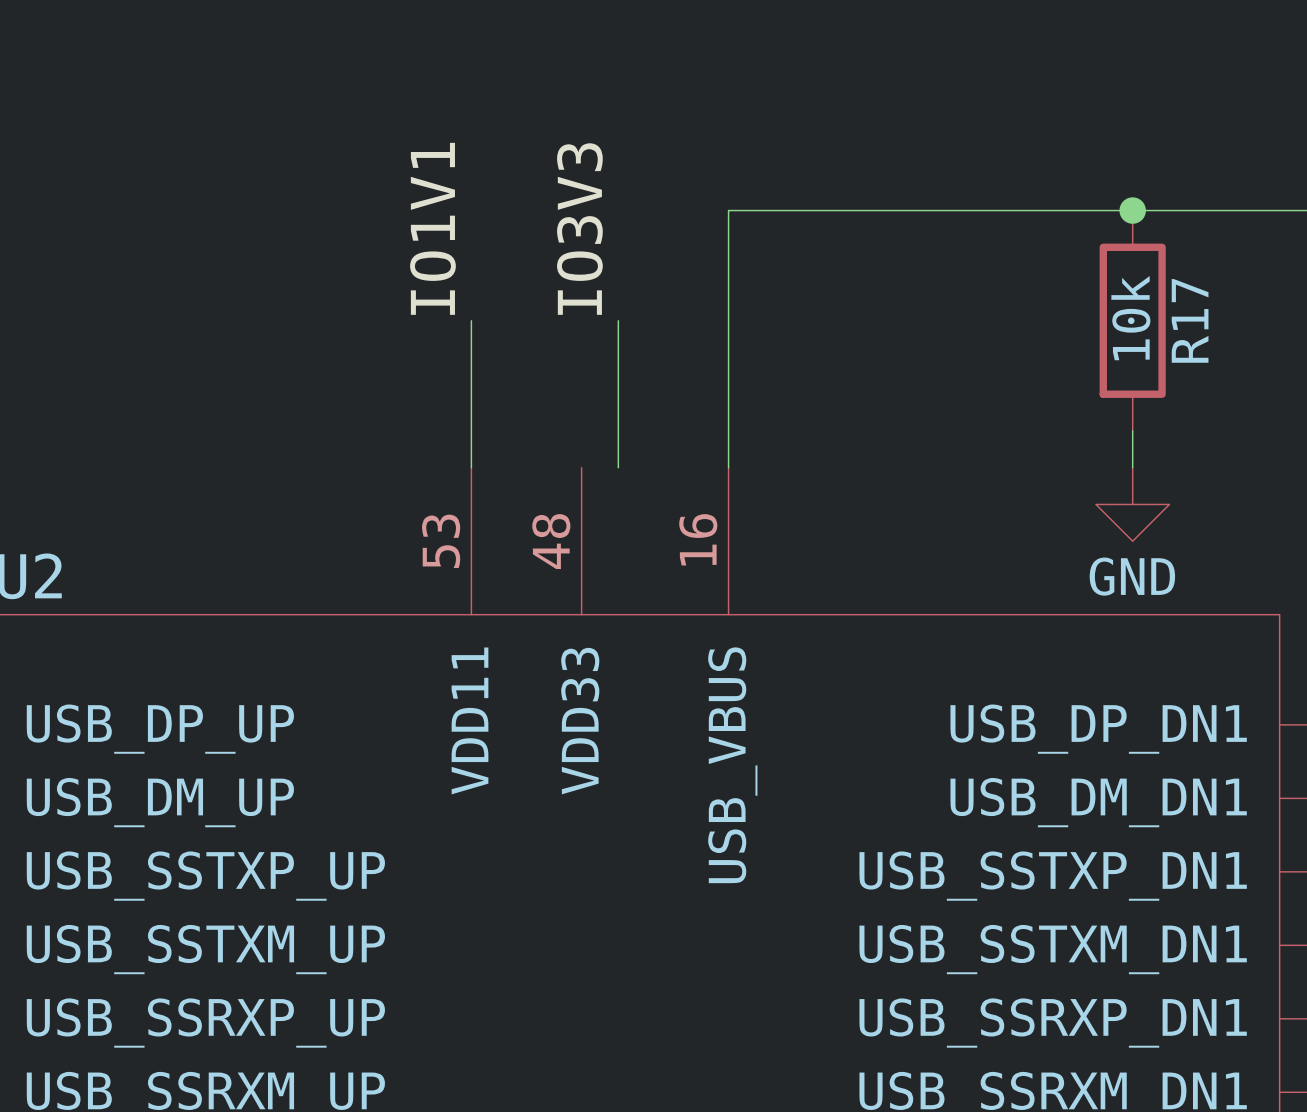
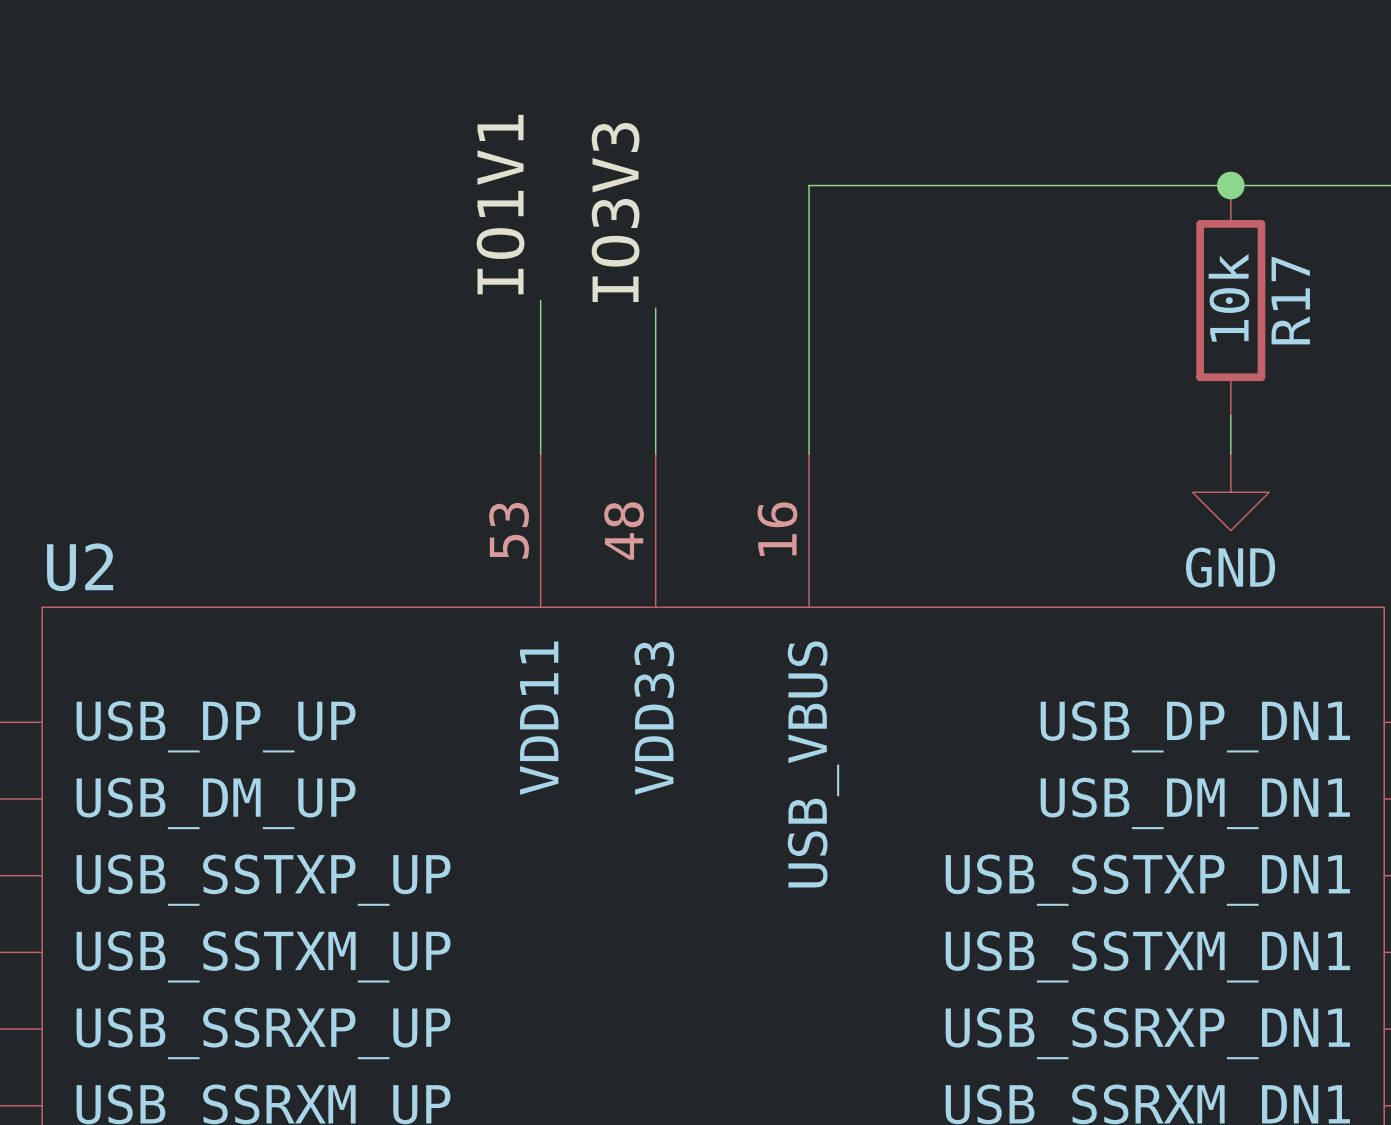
label position: IO3V3 (579, 229) -> IO3V3 (615, 212)
wire: (618, 320) (618, 467) -> none
wire: none -> (655, 308) (655, 453)

